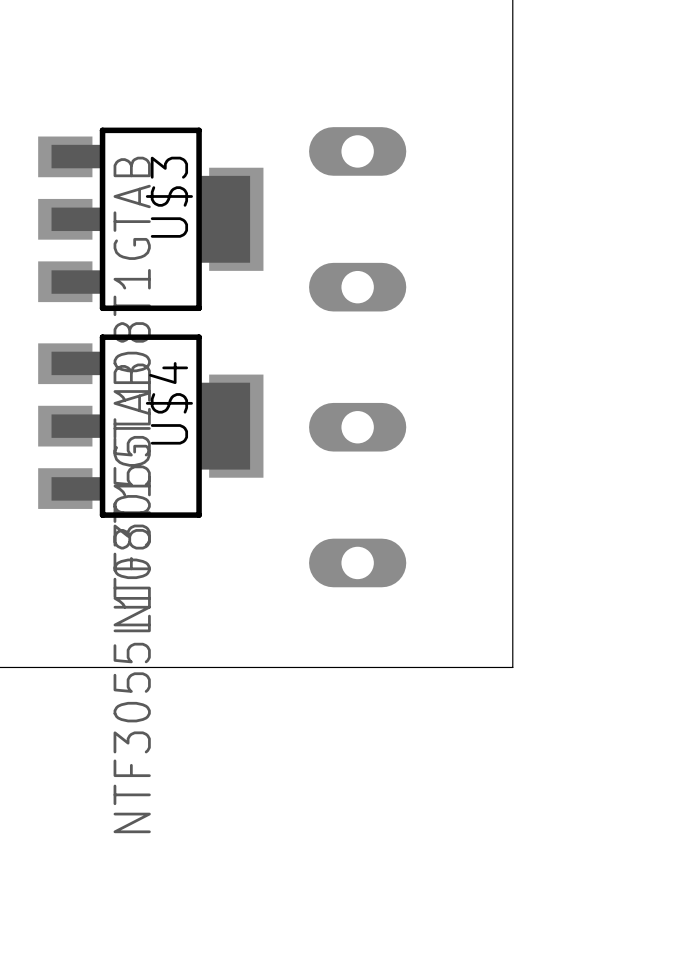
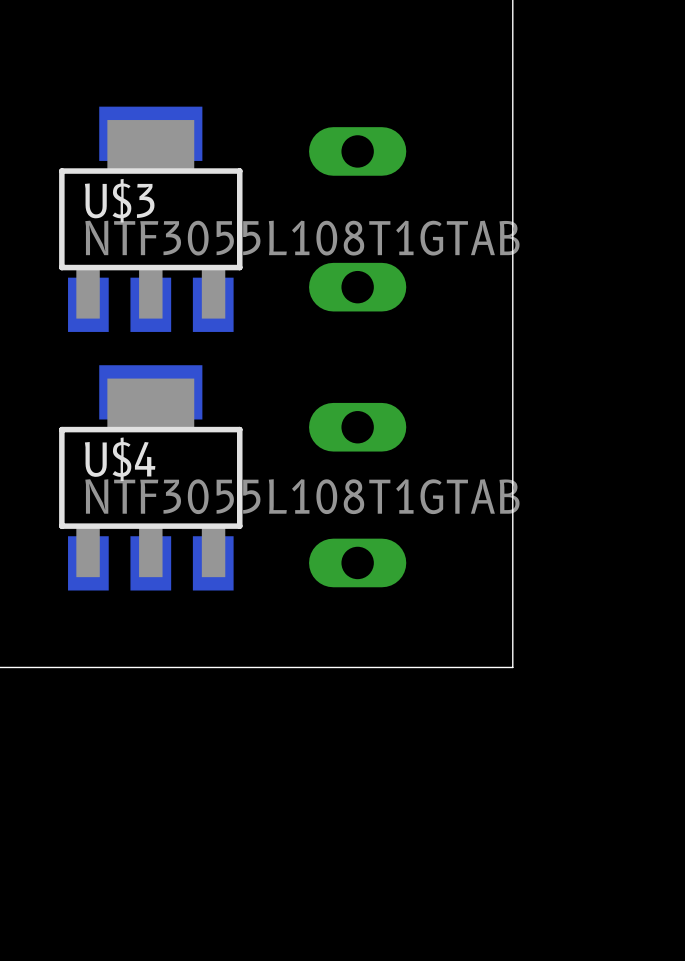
U$3 rotation: 0° (150, 219) -> 90° counterclockwise (150, 219)
U$4 rotation: 0° (150, 426) -> 90° counterclockwise (150, 477)

